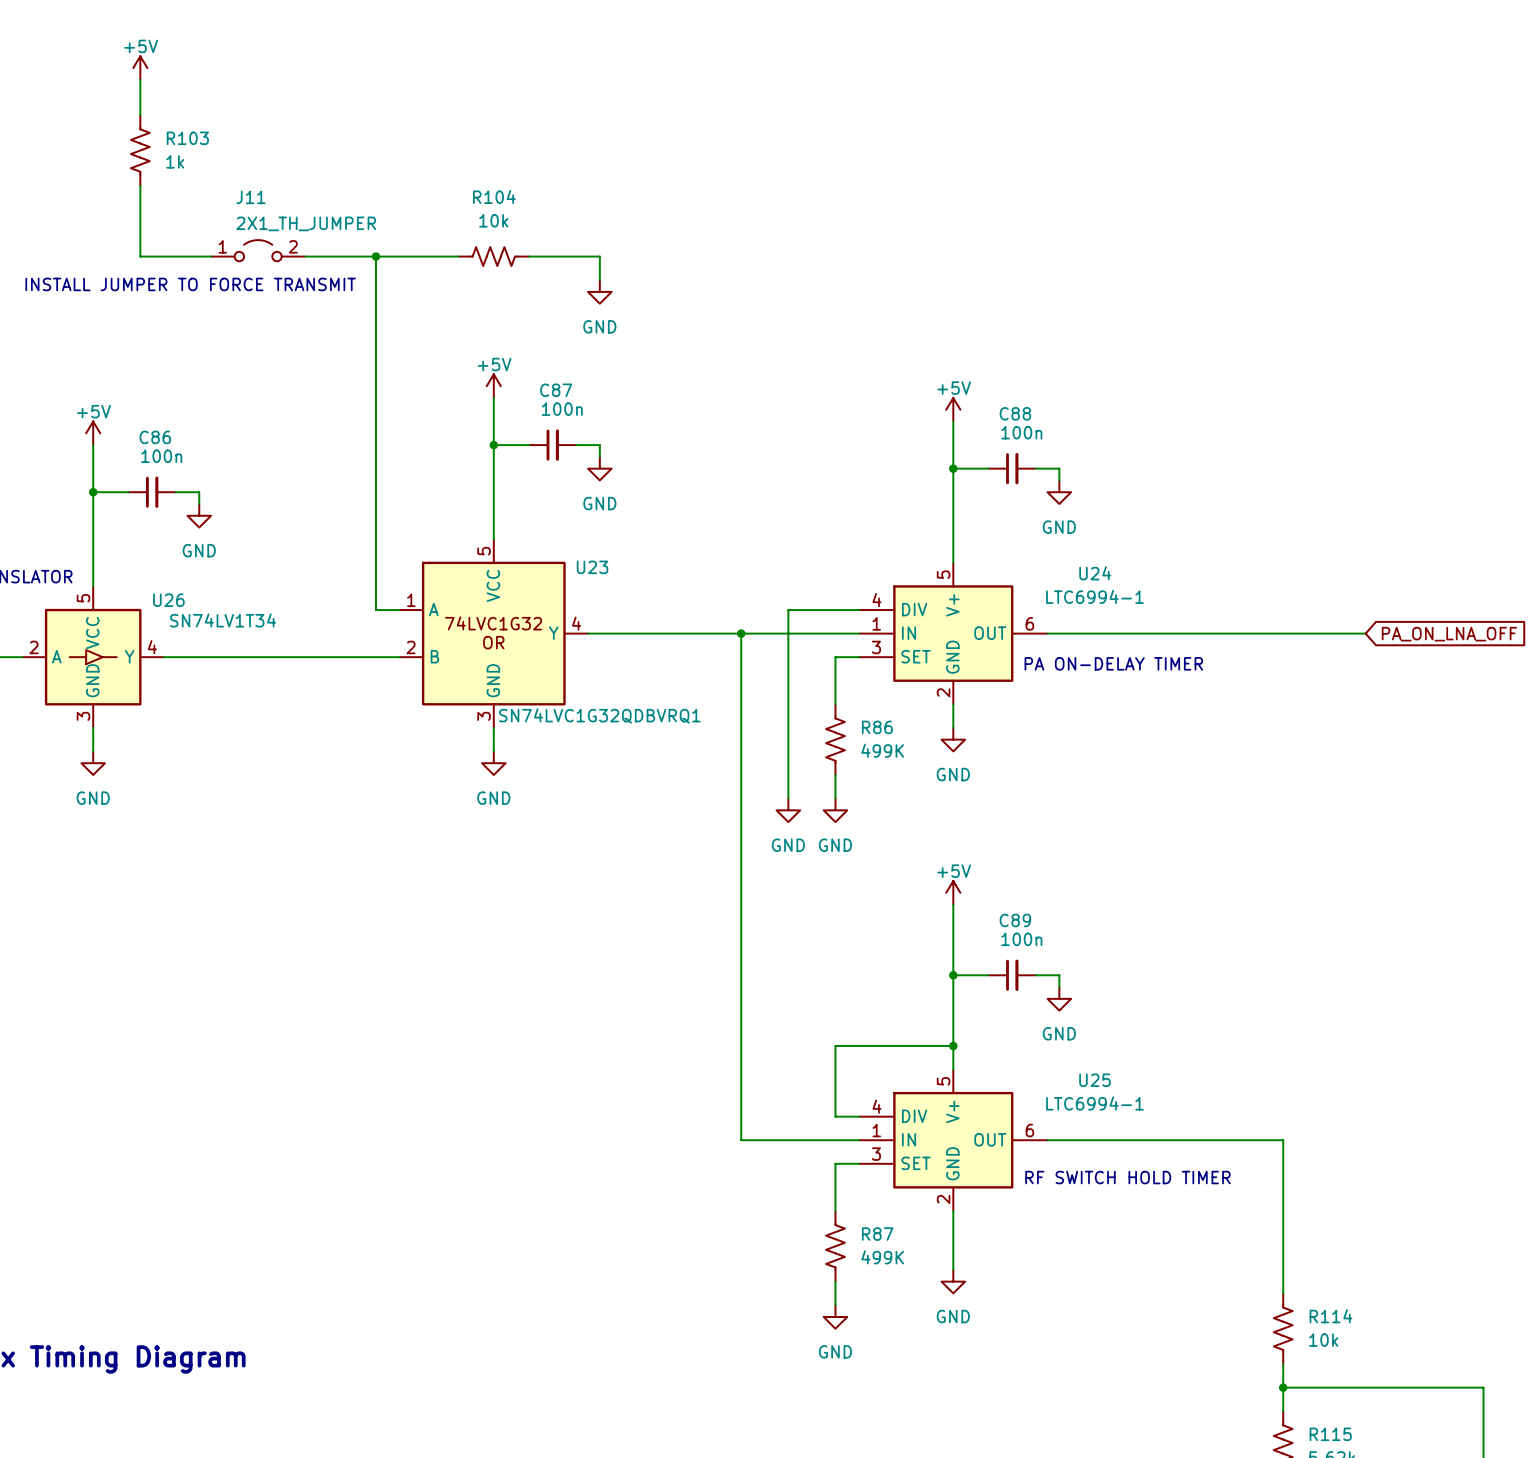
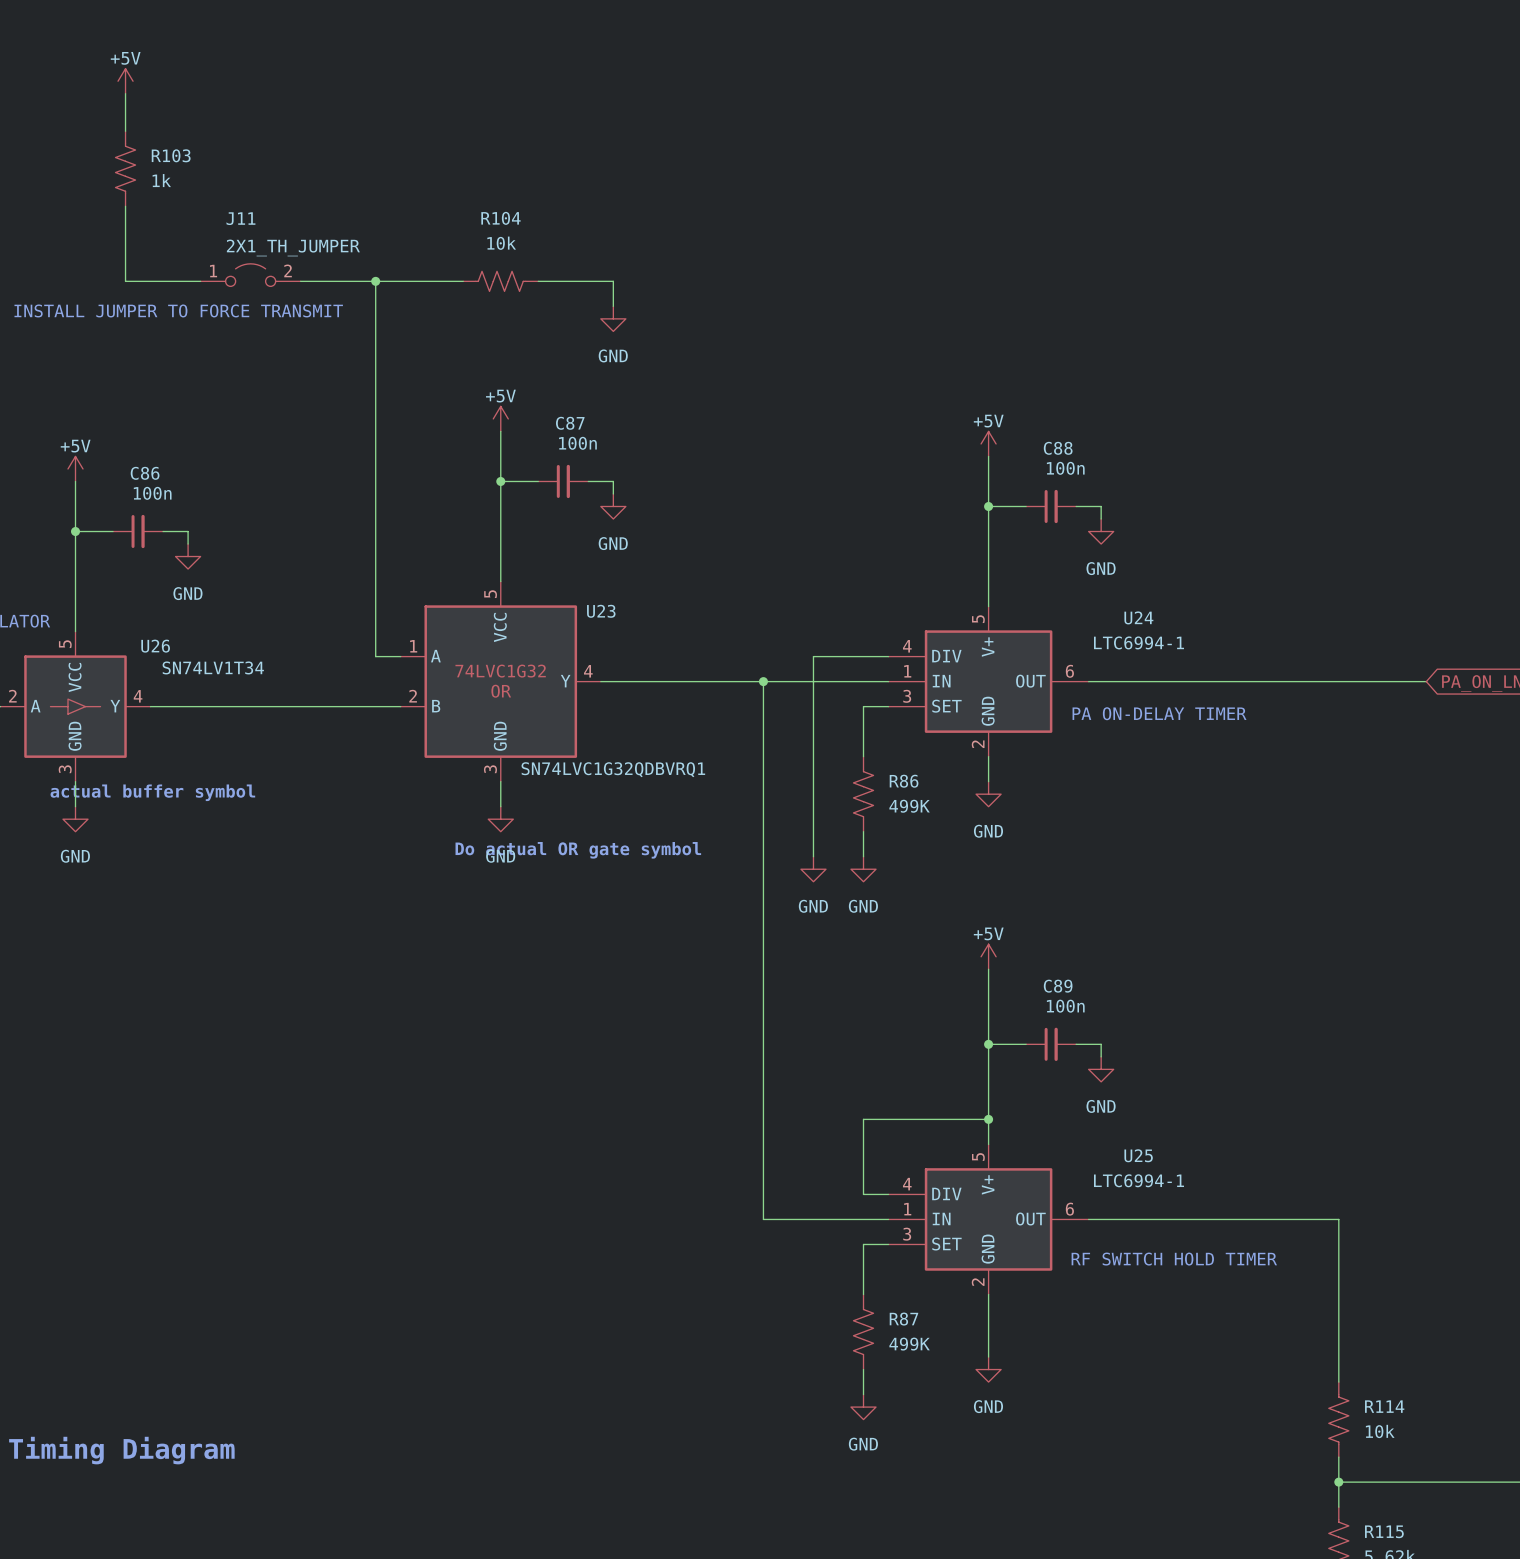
text: none -> actual buffer symbol (152, 792)
text: none -> Do actual OR gate symbol (578, 850)

